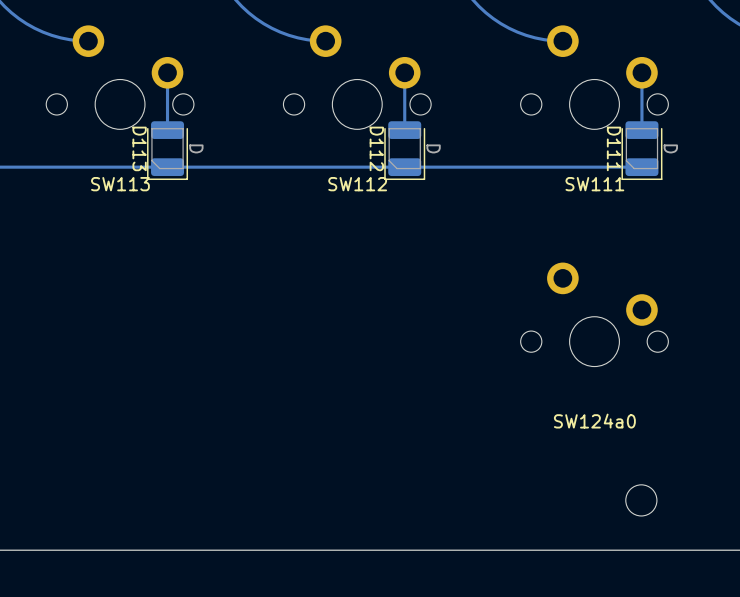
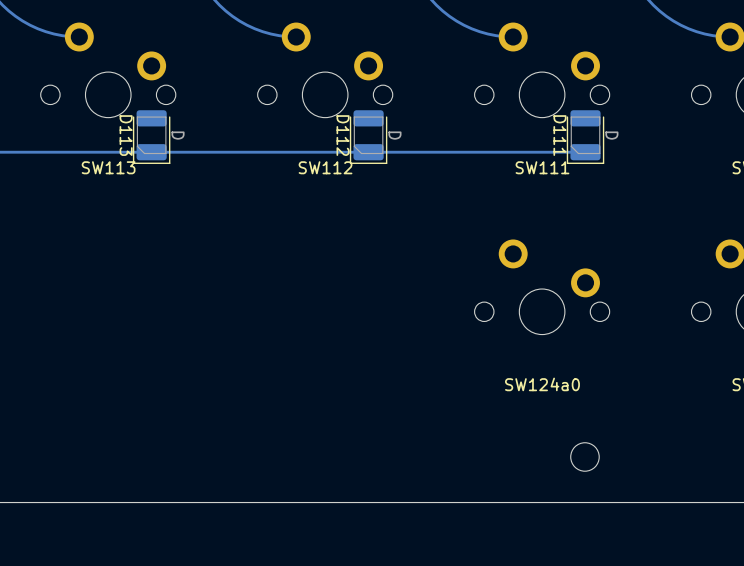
bottom track: (167, 72) (167, 130) -> none
bottom track: (404, 72) (404, 130) -> none
bottom track: (641, 72) (641, 130) -> none

